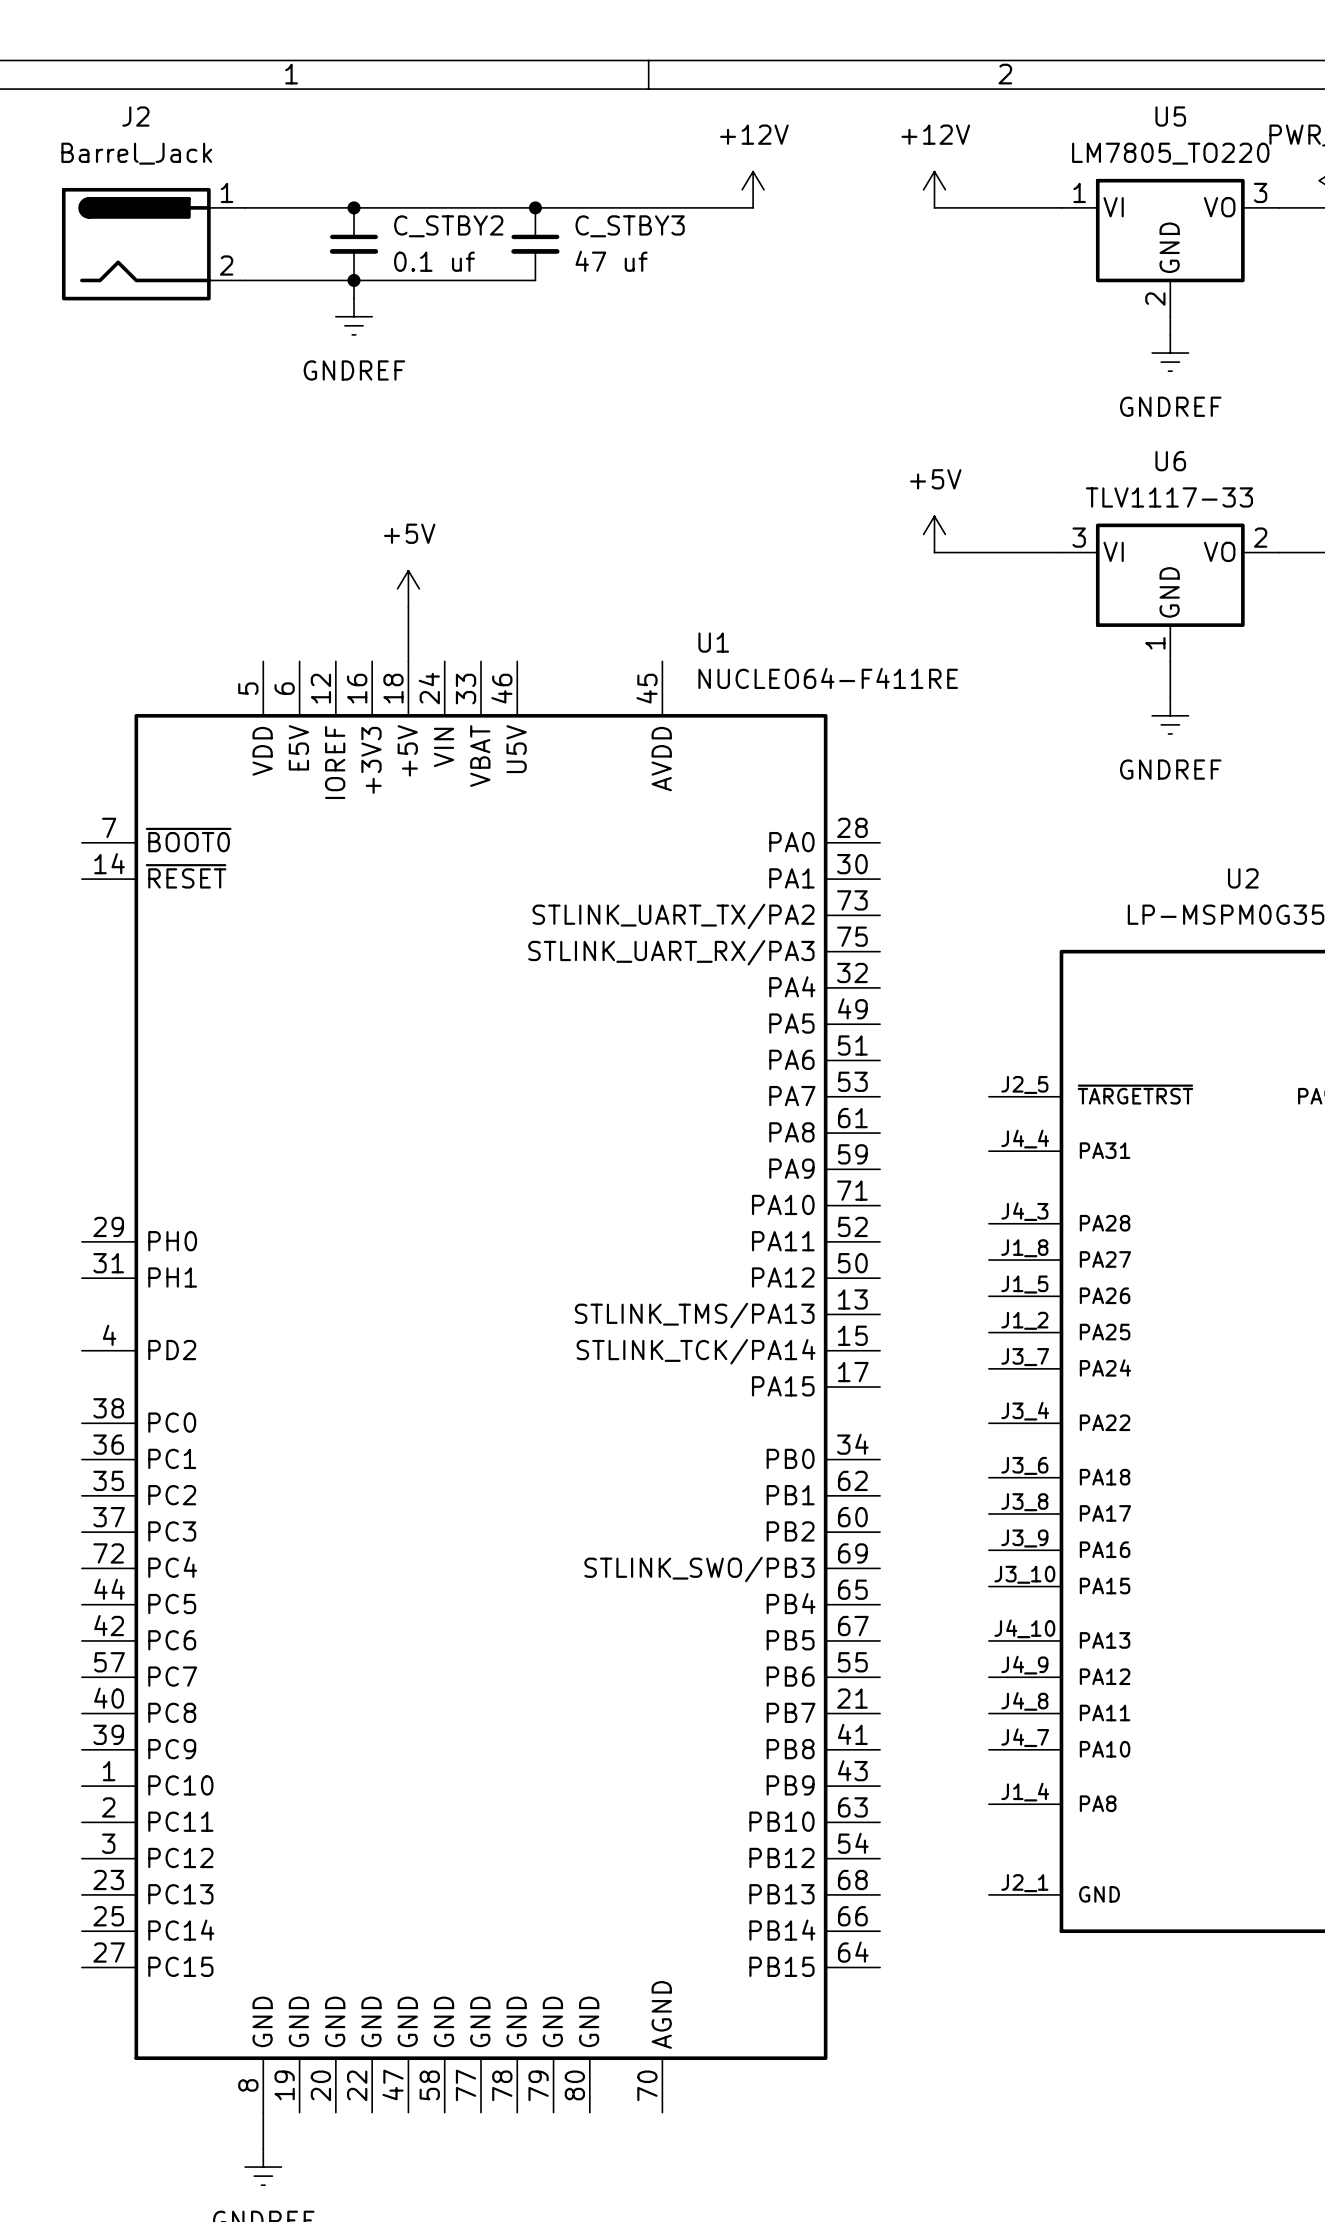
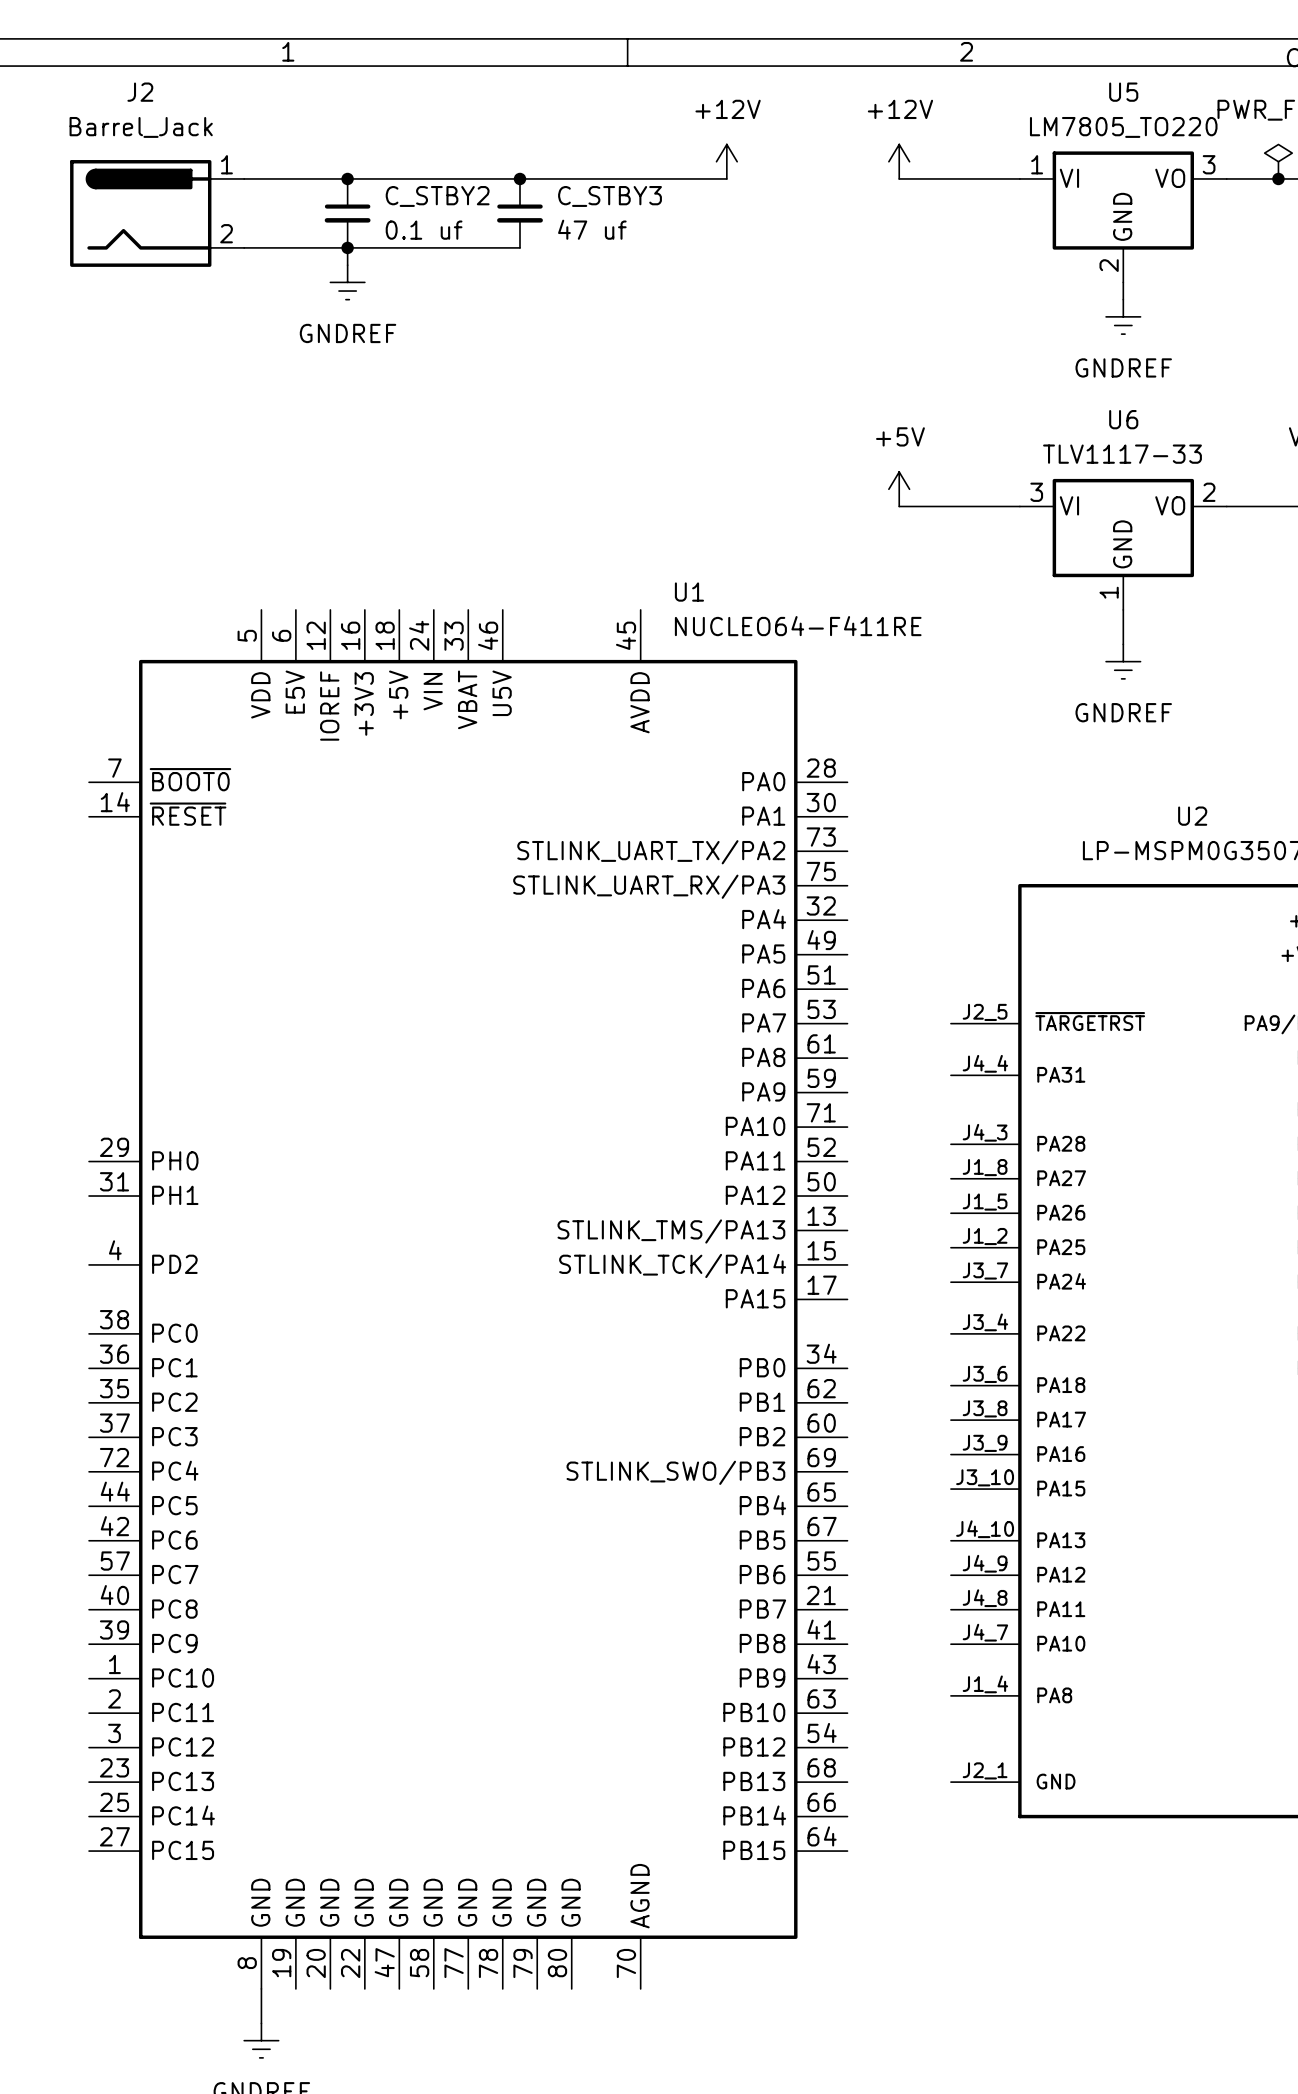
power symbol: +5V (408, 588) -> none
wire: (408, 606) (408, 661) -> none

